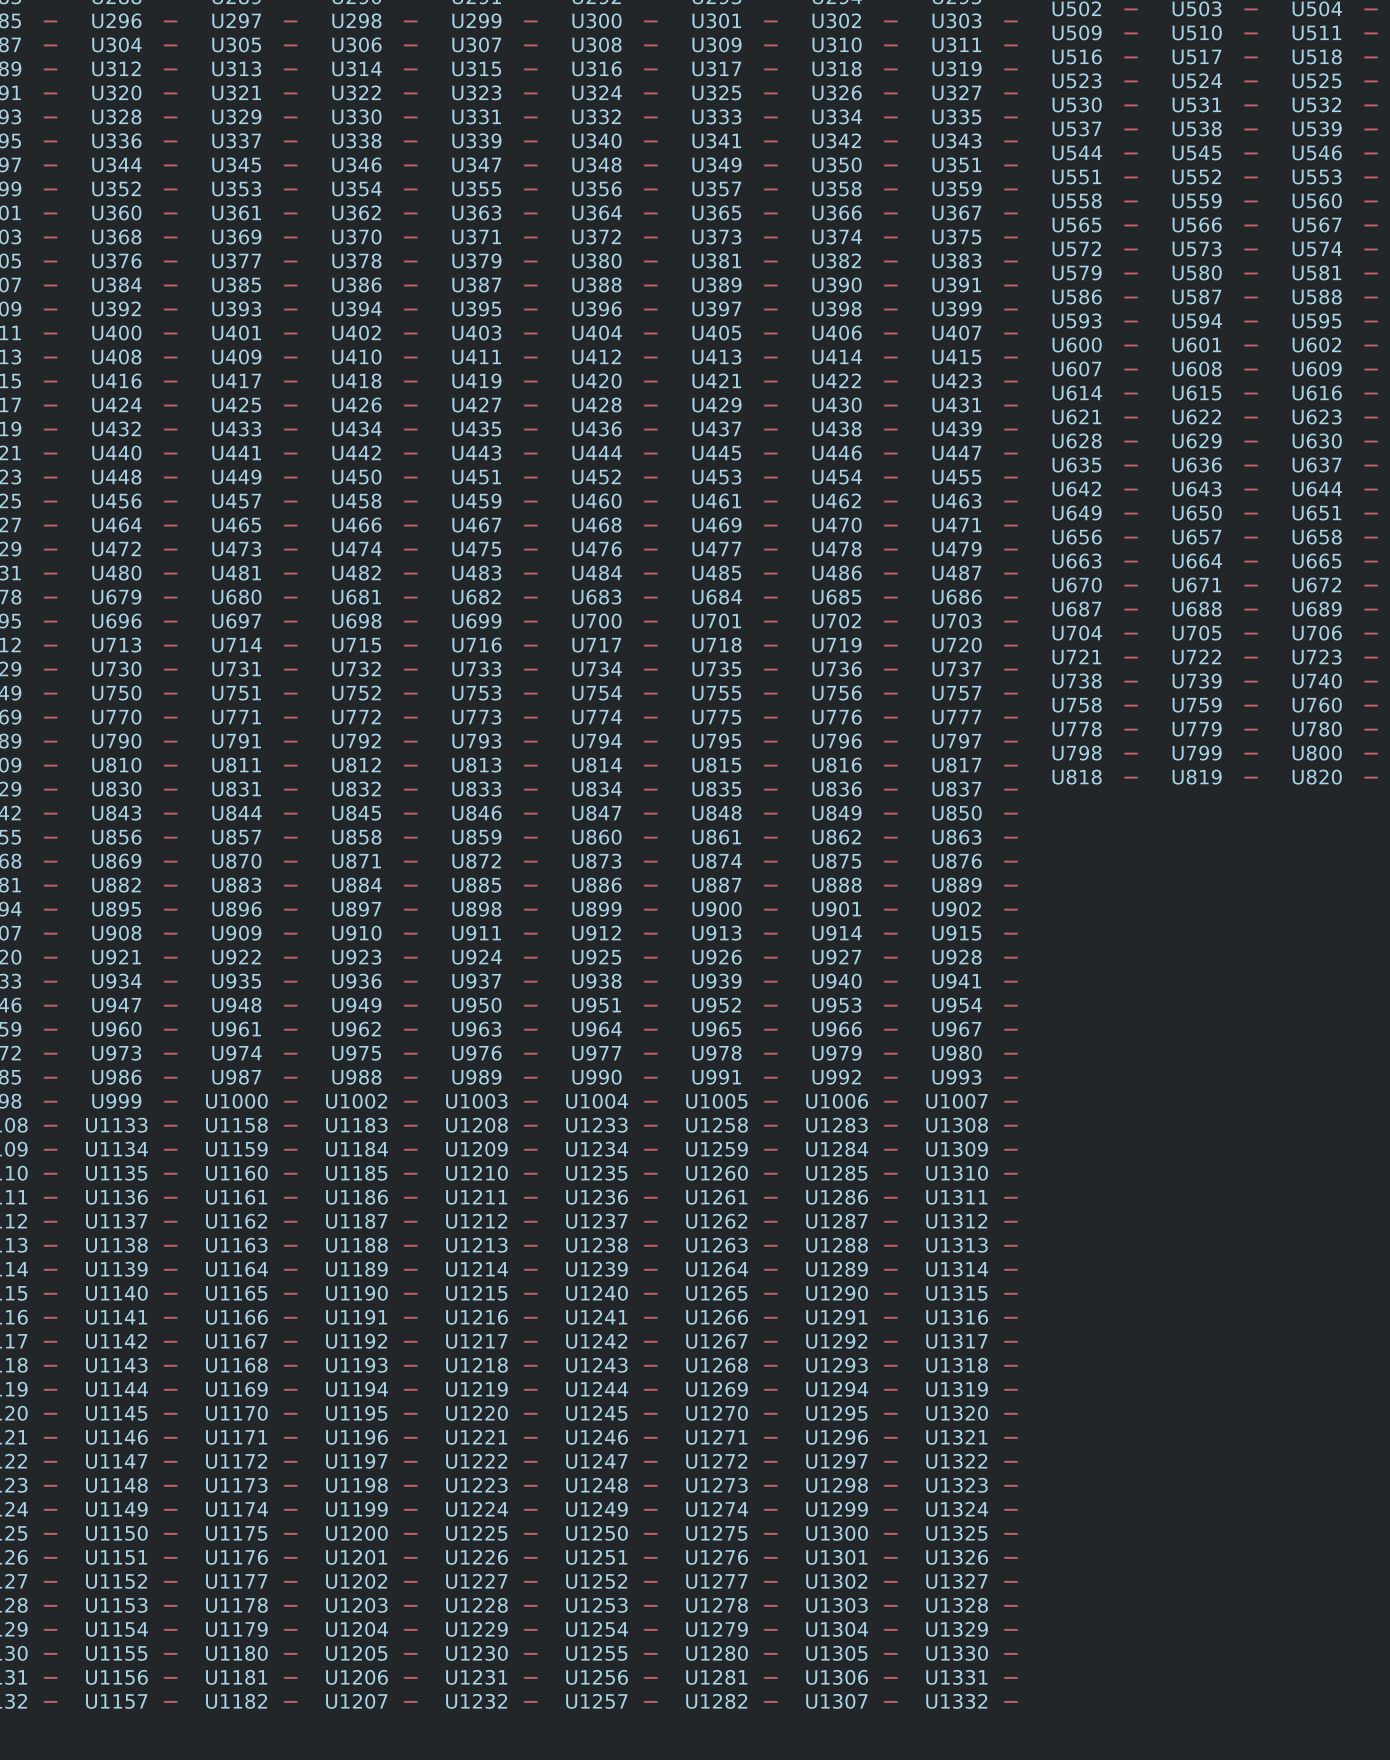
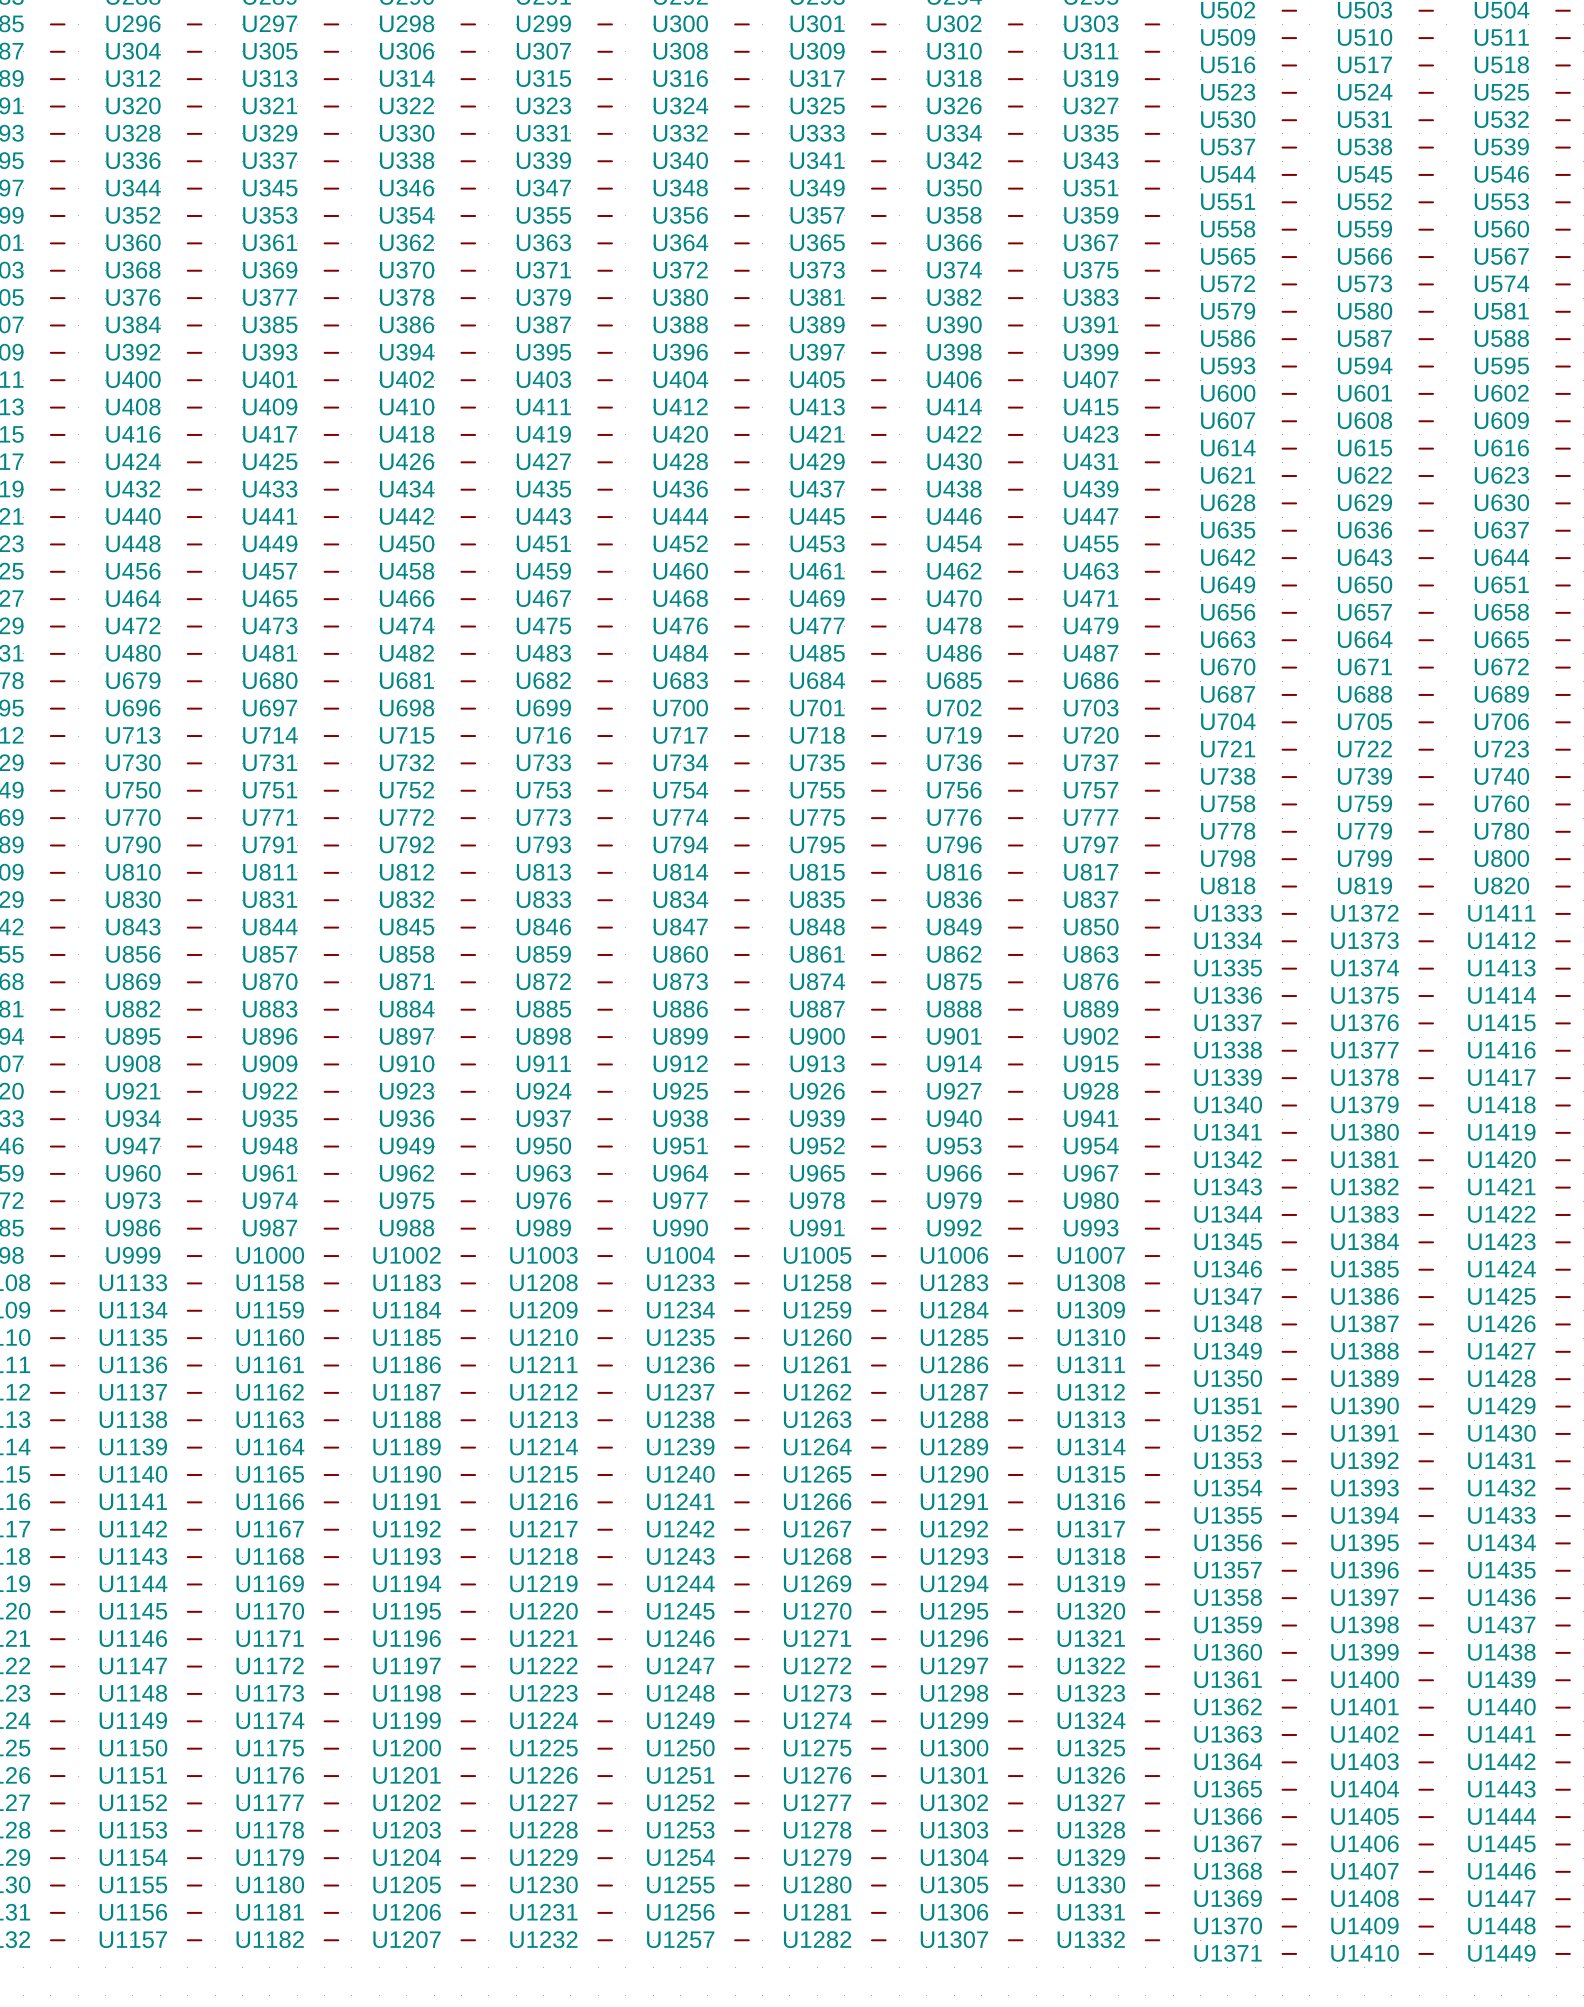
U1333: none -> (1289, 913)
U1372: none -> (1426, 913)
U1411: none -> (1563, 913)
U1334: none -> (1289, 941)
U1373: none -> (1426, 941)
U1412: none -> (1563, 941)
U1335: none -> (1289, 968)
U1374: none -> (1426, 968)
U1413: none -> (1563, 968)
U1336: none -> (1289, 996)
U1375: none -> (1426, 996)
U1414: none -> (1563, 996)
U1337: none -> (1289, 1023)
U1376: none -> (1426, 1023)
U1415: none -> (1563, 1023)
U1338: none -> (1289, 1050)
U1377: none -> (1426, 1050)
U1416: none -> (1563, 1050)
U1339: none -> (1289, 1078)
U1378: none -> (1426, 1078)
U1417: none -> (1563, 1078)
U1340: none -> (1289, 1105)
U1379: none -> (1426, 1105)
U1418: none -> (1563, 1105)
U1341: none -> (1289, 1132)
U1380: none -> (1426, 1132)
U1419: none -> (1563, 1132)
U1342: none -> (1289, 1160)
U1381: none -> (1426, 1160)
U1420: none -> (1563, 1160)
U1343: none -> (1289, 1187)
U1382: none -> (1426, 1187)
U1421: none -> (1563, 1187)
U1344: none -> (1289, 1214)
U1383: none -> (1426, 1214)
U1422: none -> (1563, 1214)
U1345: none -> (1289, 1242)
U1384: none -> (1426, 1242)
U1423: none -> (1563, 1242)
U1346: none -> (1289, 1269)
U1385: none -> (1426, 1269)
U1424: none -> (1563, 1269)
U1347: none -> (1289, 1297)
U1386: none -> (1426, 1297)
U1425: none -> (1563, 1297)
U1348: none -> (1289, 1324)
U1387: none -> (1426, 1324)
U1426: none -> (1563, 1324)
U1349: none -> (1289, 1351)
U1388: none -> (1426, 1351)
U1427: none -> (1563, 1351)
U1350: none -> (1289, 1379)
U1389: none -> (1426, 1379)
U1428: none -> (1563, 1379)
U1351: none -> (1289, 1406)
U1390: none -> (1426, 1406)
U1429: none -> (1563, 1406)
U1352: none -> (1289, 1433)
U1391: none -> (1426, 1433)
U1430: none -> (1563, 1433)
U1353: none -> (1289, 1461)
U1392: none -> (1426, 1461)
U1431: none -> (1563, 1461)
U1354: none -> (1289, 1488)
U1393: none -> (1426, 1488)
U1432: none -> (1563, 1488)
U1355: none -> (1289, 1516)
U1394: none -> (1426, 1516)
U1433: none -> (1563, 1516)
U1356: none -> (1289, 1543)
U1395: none -> (1426, 1543)
U1434: none -> (1563, 1543)
U1357: none -> (1289, 1570)
U1396: none -> (1426, 1570)
U1435: none -> (1563, 1570)
U1358: none -> (1289, 1598)
U1397: none -> (1426, 1598)
U1436: none -> (1563, 1598)
U1359: none -> (1289, 1625)
U1398: none -> (1426, 1625)
U1437: none -> (1563, 1625)
U1360: none -> (1289, 1652)
U1399: none -> (1426, 1652)
U1438: none -> (1563, 1652)
U1361: none -> (1289, 1680)
U1400: none -> (1426, 1680)
U1439: none -> (1563, 1680)
U1362: none -> (1289, 1707)
U1401: none -> (1426, 1707)
U1440: none -> (1563, 1707)
U1363: none -> (1289, 1734)
U1402: none -> (1426, 1734)
U1441: none -> (1563, 1734)
U1364: none -> (1289, 1762)
U1403: none -> (1426, 1762)
U1442: none -> (1563, 1762)
U1365: none -> (1289, 1789)
U1404: none -> (1426, 1789)
U1443: none -> (1563, 1789)
U1366: none -> (1289, 1817)
U1405: none -> (1426, 1817)
U1444: none -> (1563, 1817)
U1367: none -> (1289, 1844)
U1406: none -> (1426, 1844)
U1445: none -> (1563, 1844)
U1368: none -> (1289, 1871)
U1407: none -> (1426, 1871)
U1446: none -> (1563, 1871)
U1369: none -> (1289, 1899)
U1408: none -> (1426, 1899)
U1447: none -> (1563, 1899)
U1370: none -> (1289, 1926)
U1409: none -> (1426, 1926)
U1448: none -> (1563, 1926)
U1371: none -> (1289, 1953)
U1410: none -> (1426, 1953)
U1449: none -> (1563, 1953)

